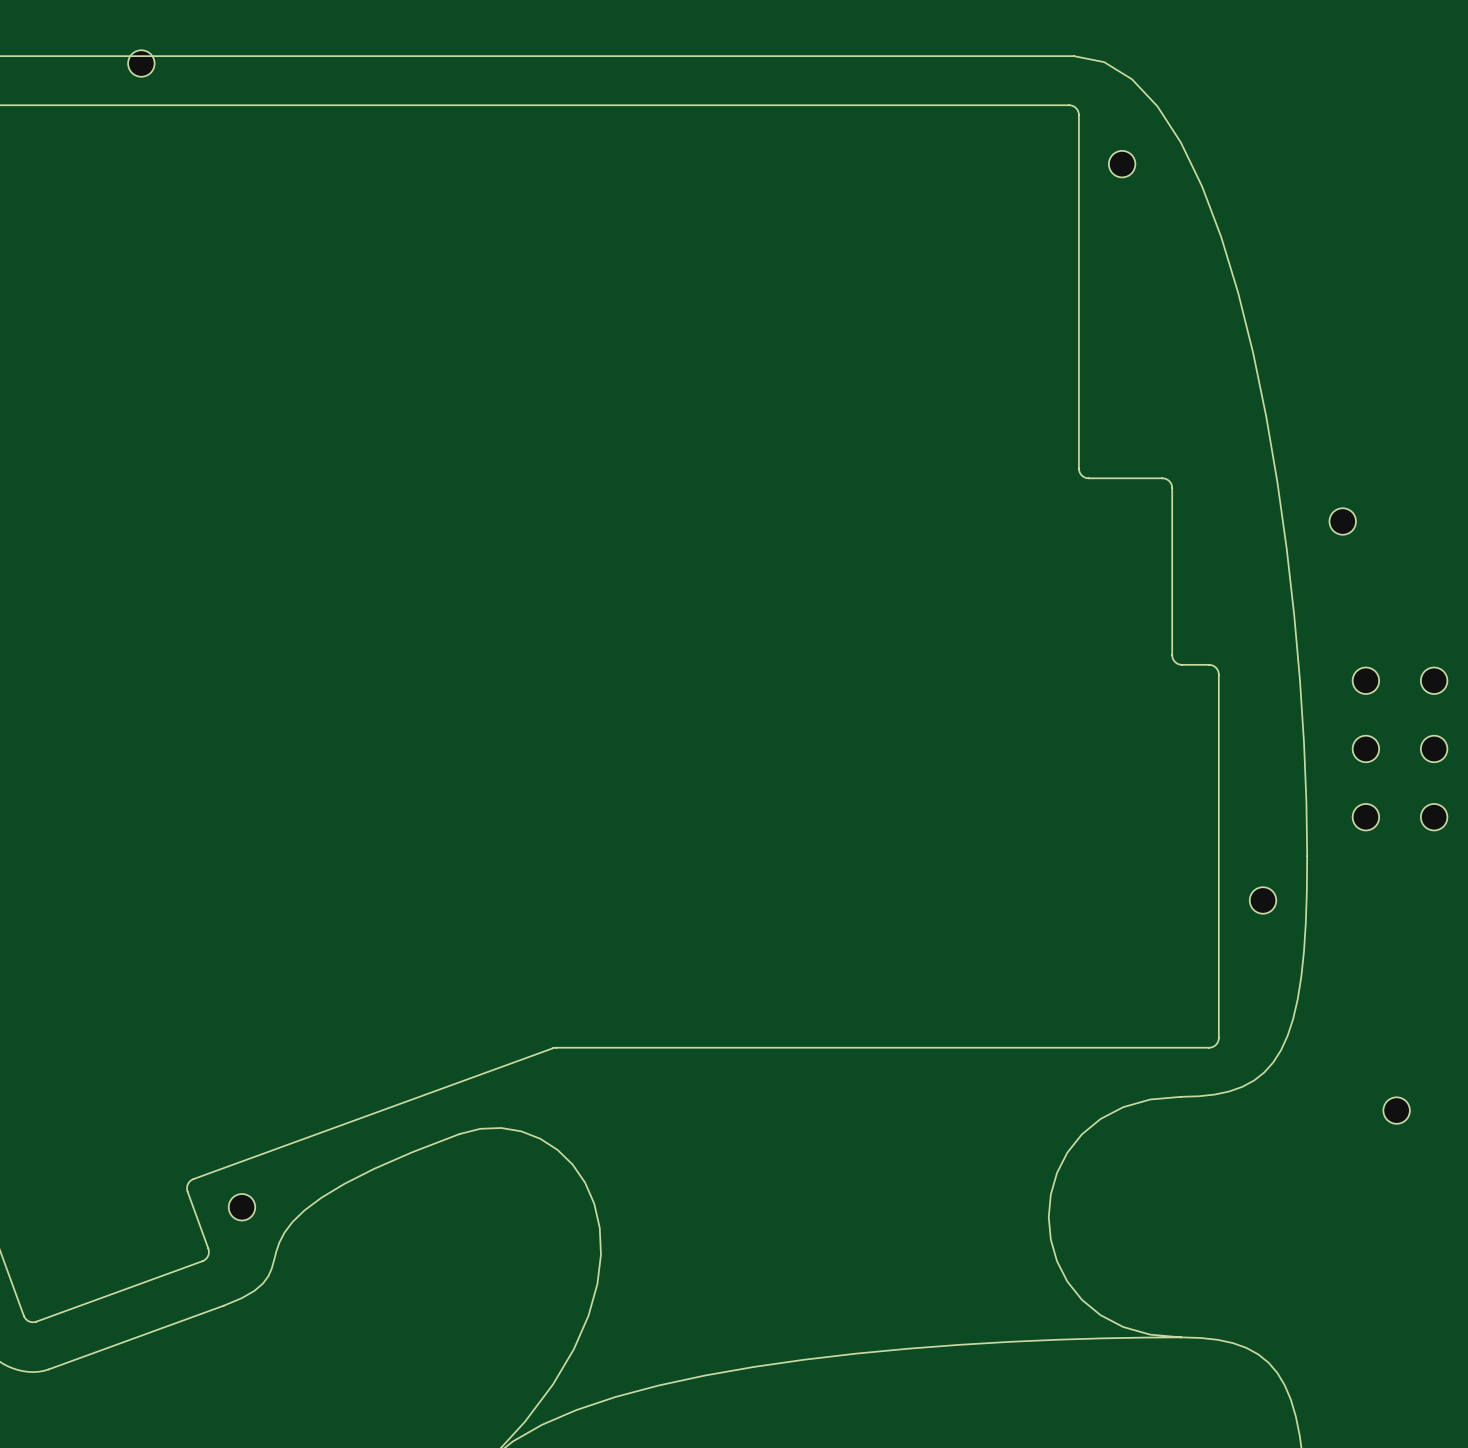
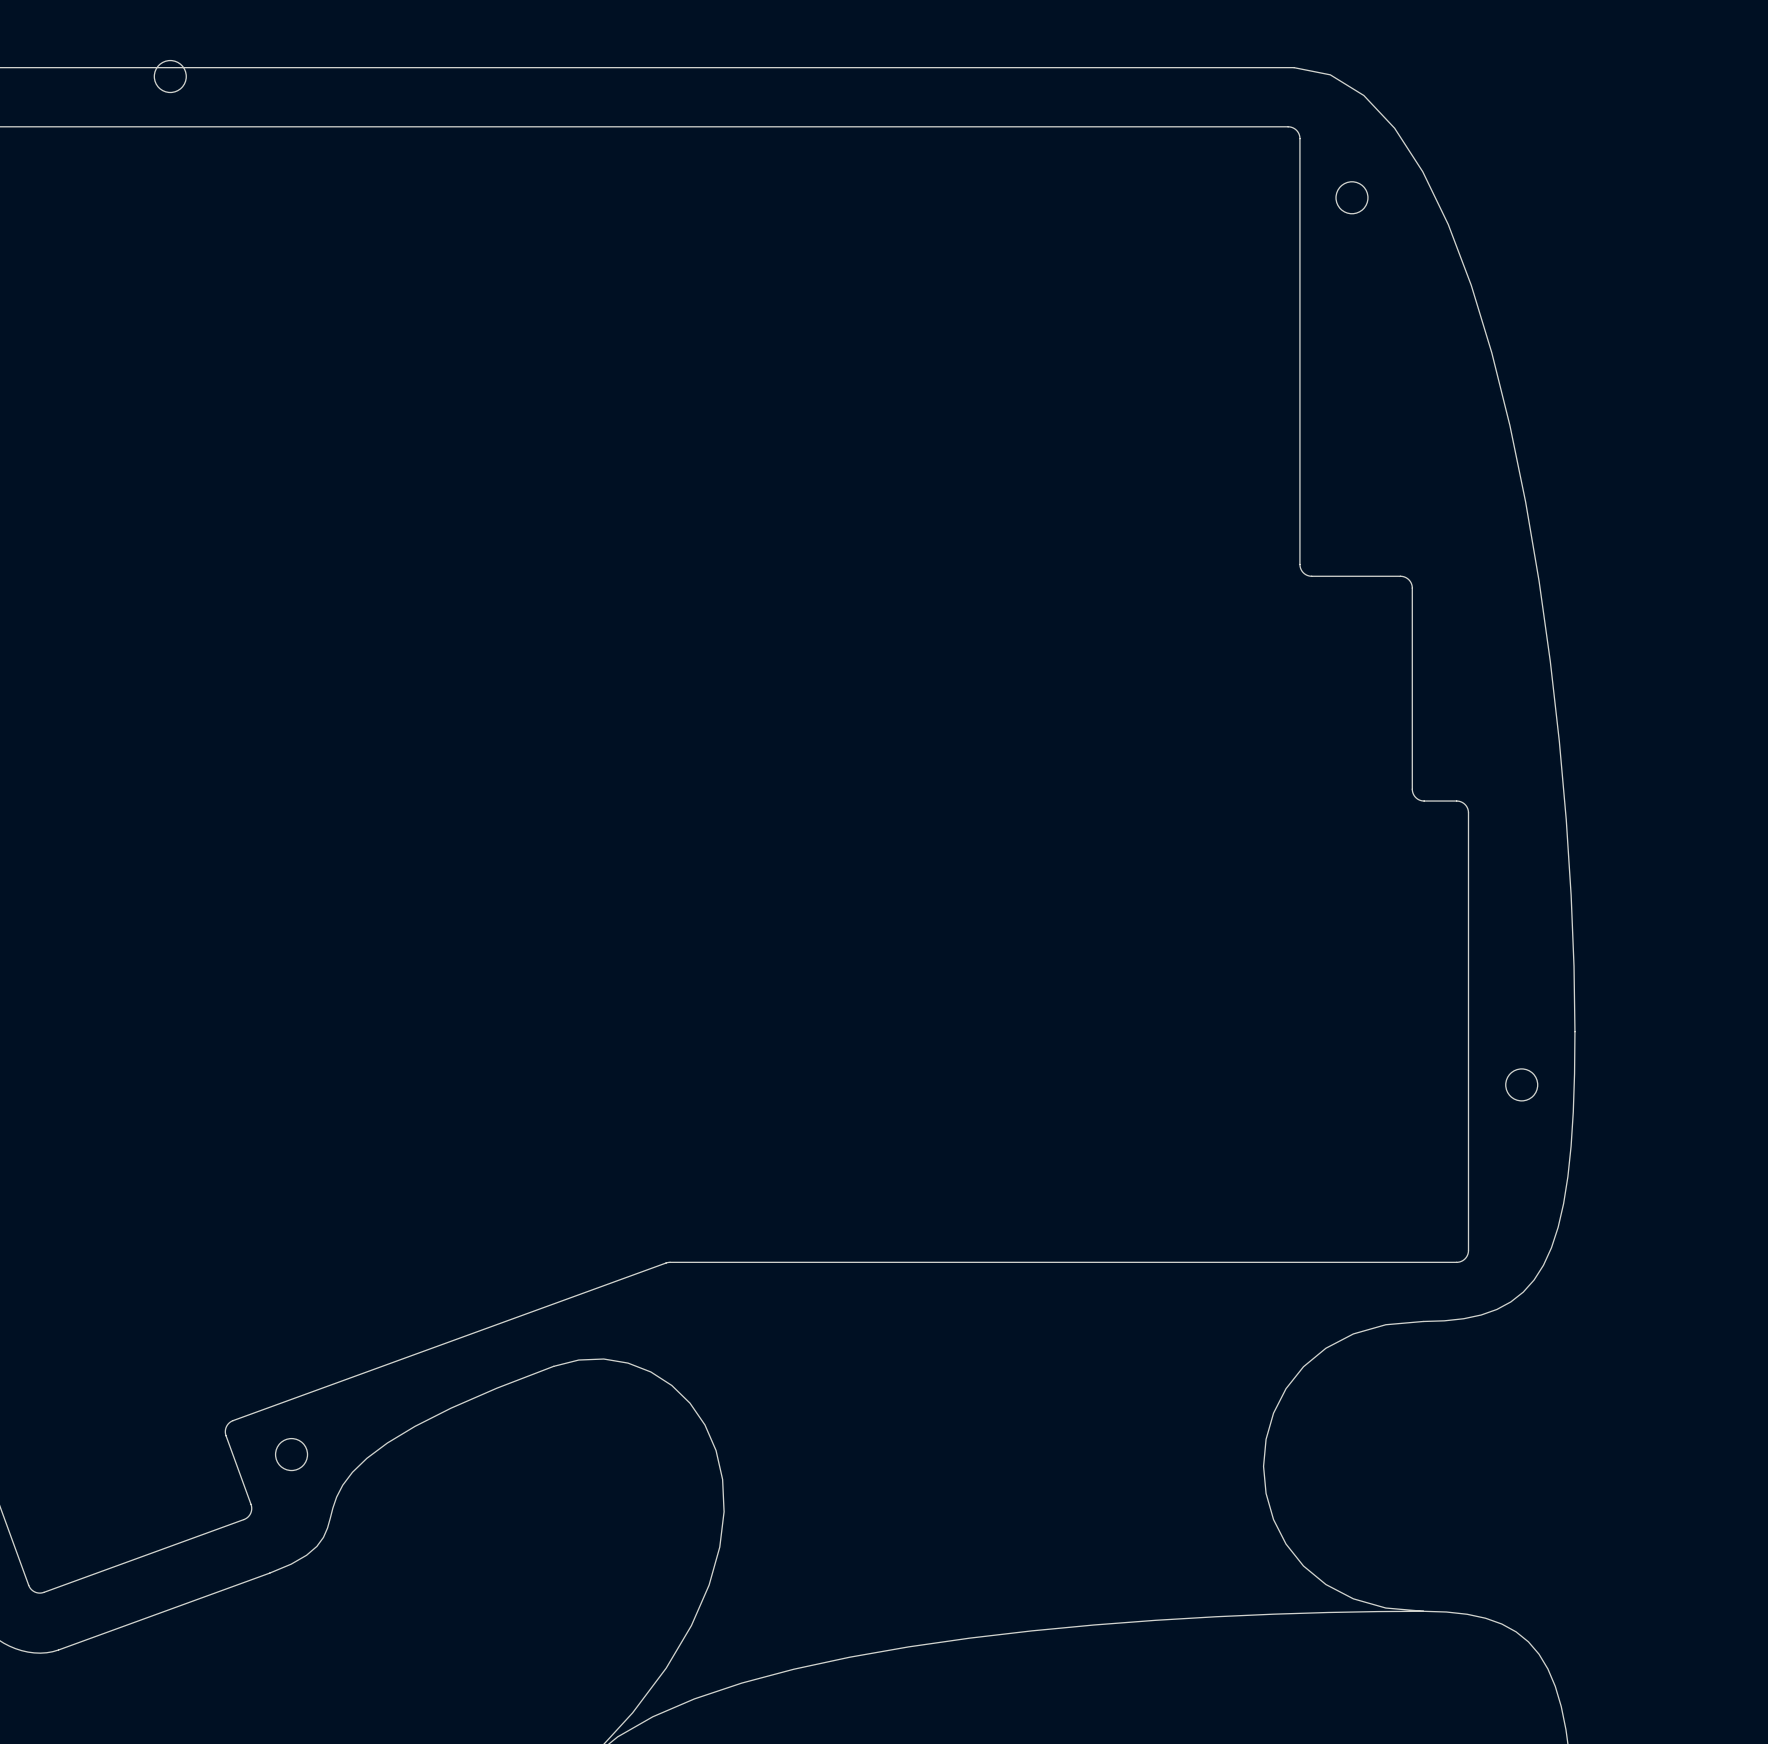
part: (1342, 521) -> none
part: (1365, 680) -> none
part: (1434, 680) -> none
part: (1365, 748) -> none
part: (1434, 748) -> none
part: (1365, 817) -> none
part: (1434, 817) -> none
part: (1396, 1110) -> none

